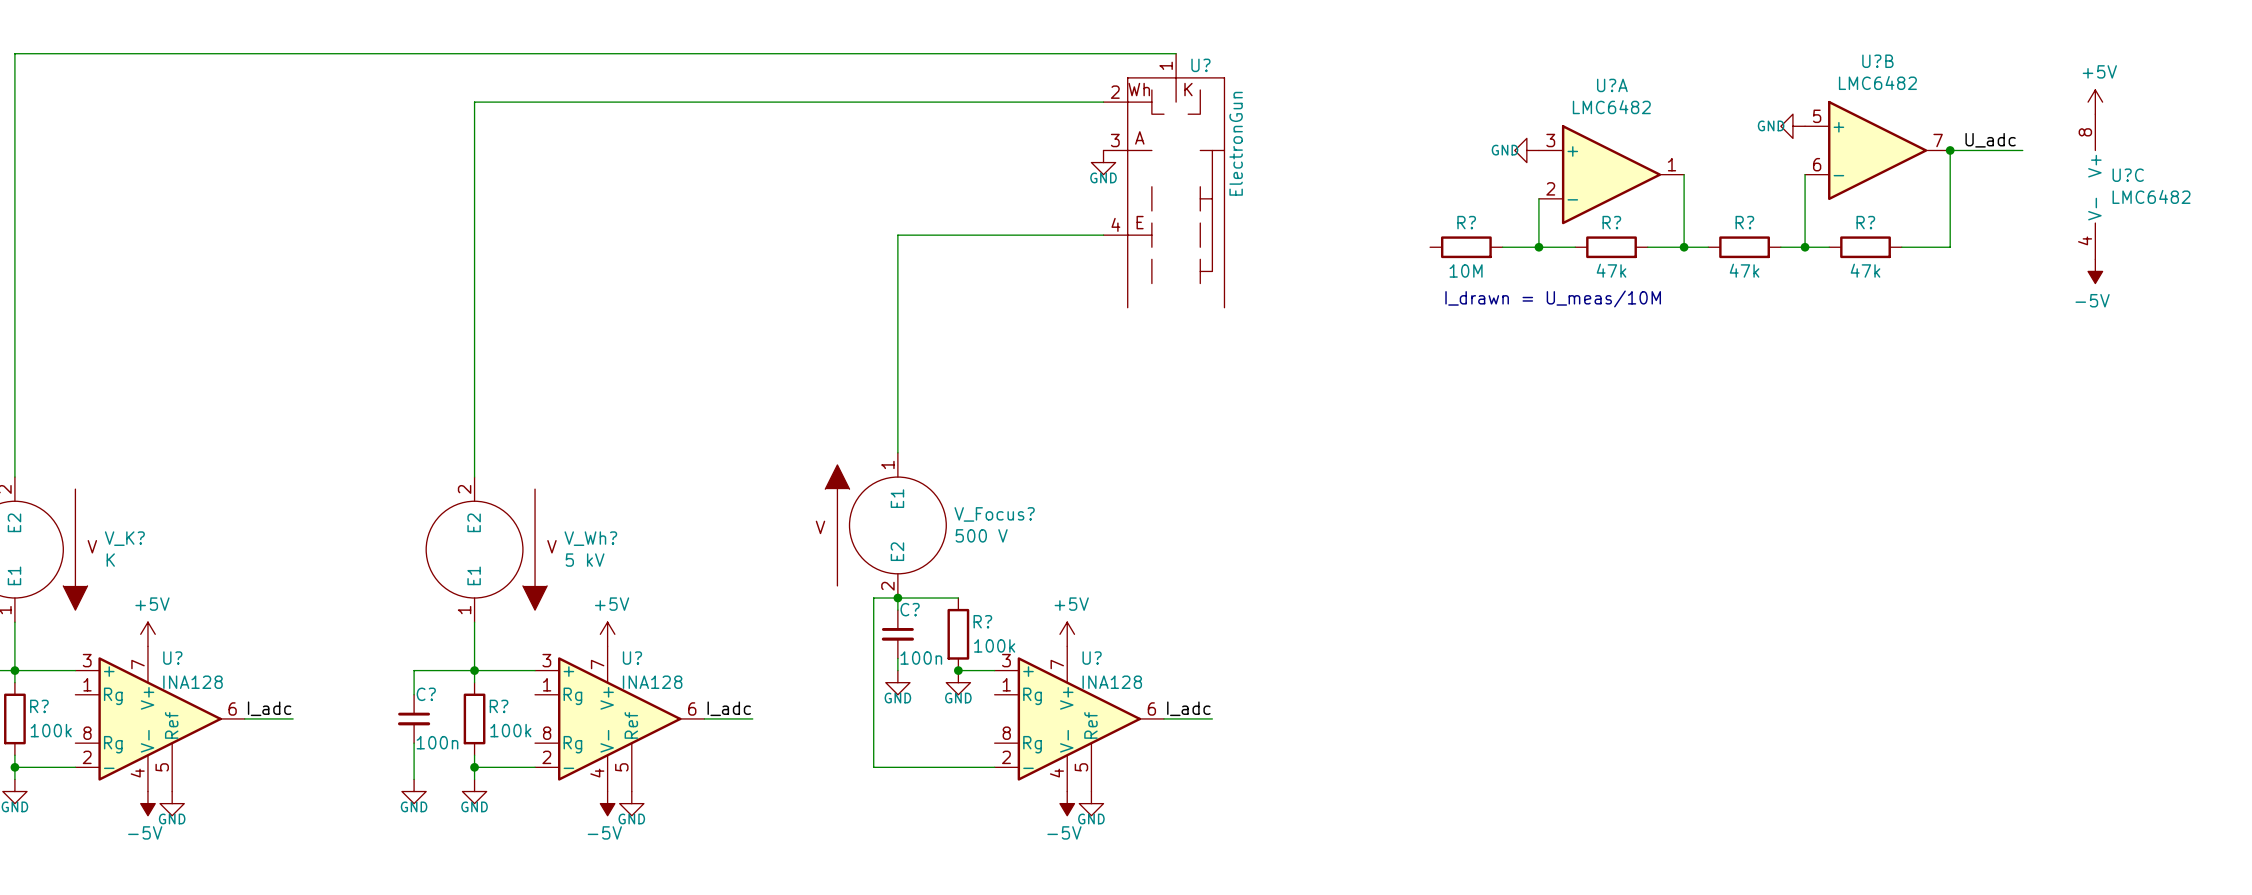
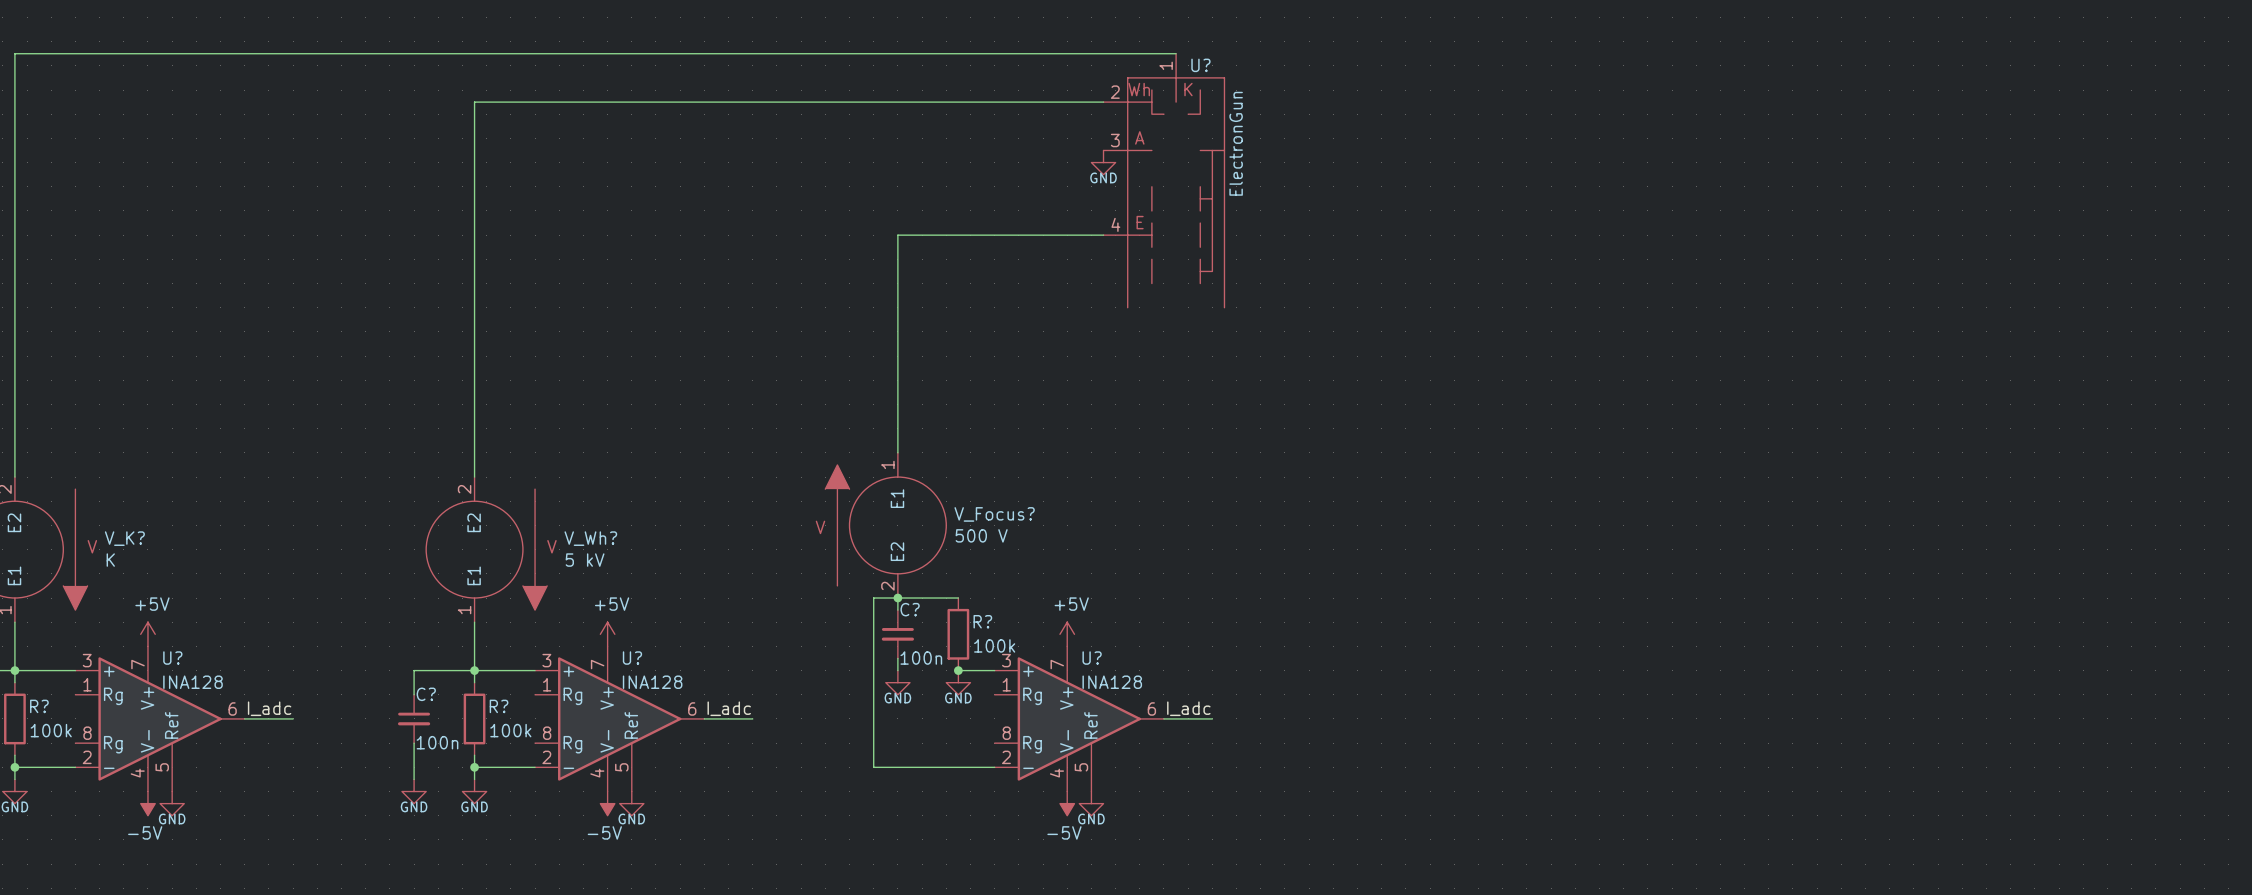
power symbol: +5V (2095, 102) -> none
power symbol: GND (1792, 126) -> none
label: U_adc (1990, 140) -> none
power symbol: GND (1526, 150) -> none
U?B: LMC6482 (1877, 150) -> none
junction: (1950, 150) -> none
wire: (2022, 150) (1950, 150) (1950, 247) (1901, 247) -> none
U?A: LMC6482 (1611, 174) -> none
wire: (1684, 174) (1684, 247) -> none
wire: (1805, 174) (1805, 247) -> none
U?C: LMC6482 (2095, 186) -> none
wire: (1538, 198) (1538, 247) -> none
R?: 10M (1466, 247) -> none
wire: (1502, 247) (1575, 247) -> none
junction: (1538, 247) -> none
R?: 47k (1611, 247) -> none
wire: (1647, 247) (1708, 247) -> none
junction: (1684, 247) -> none
R?: 47k (1744, 247) -> none
wire: (1780, 247) (1829, 247) -> none
junction: (1805, 247) -> none
R?: 47k (1865, 247) -> none
power symbol: -5V (2095, 271) -> none
text: I_drawn = U_meas/10M (1553, 298) -> none

